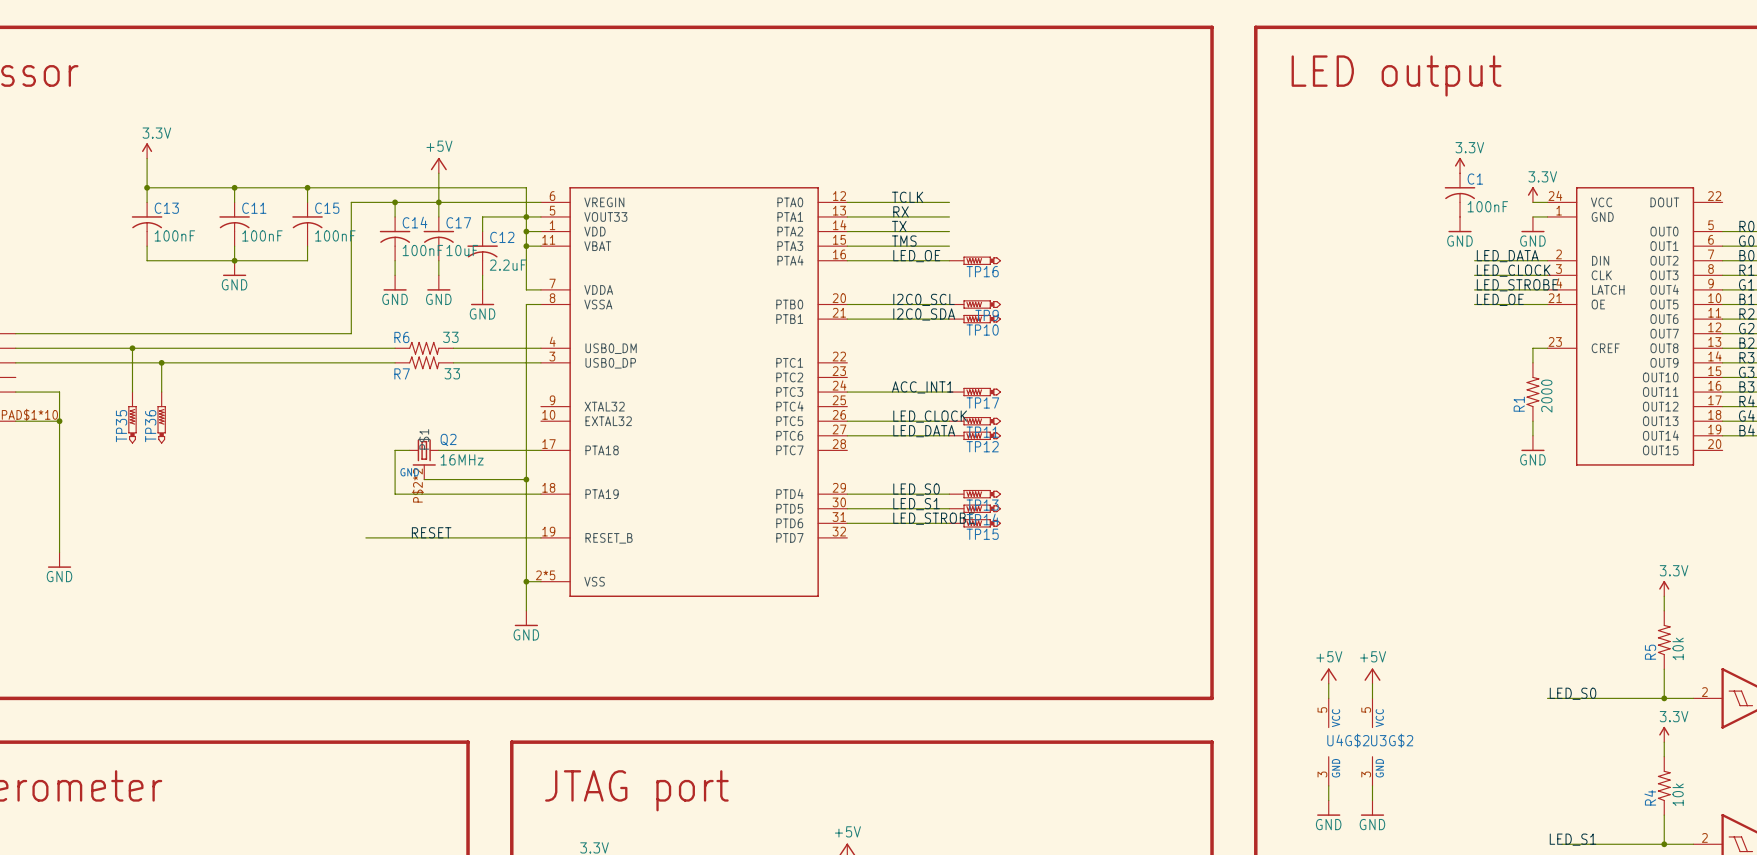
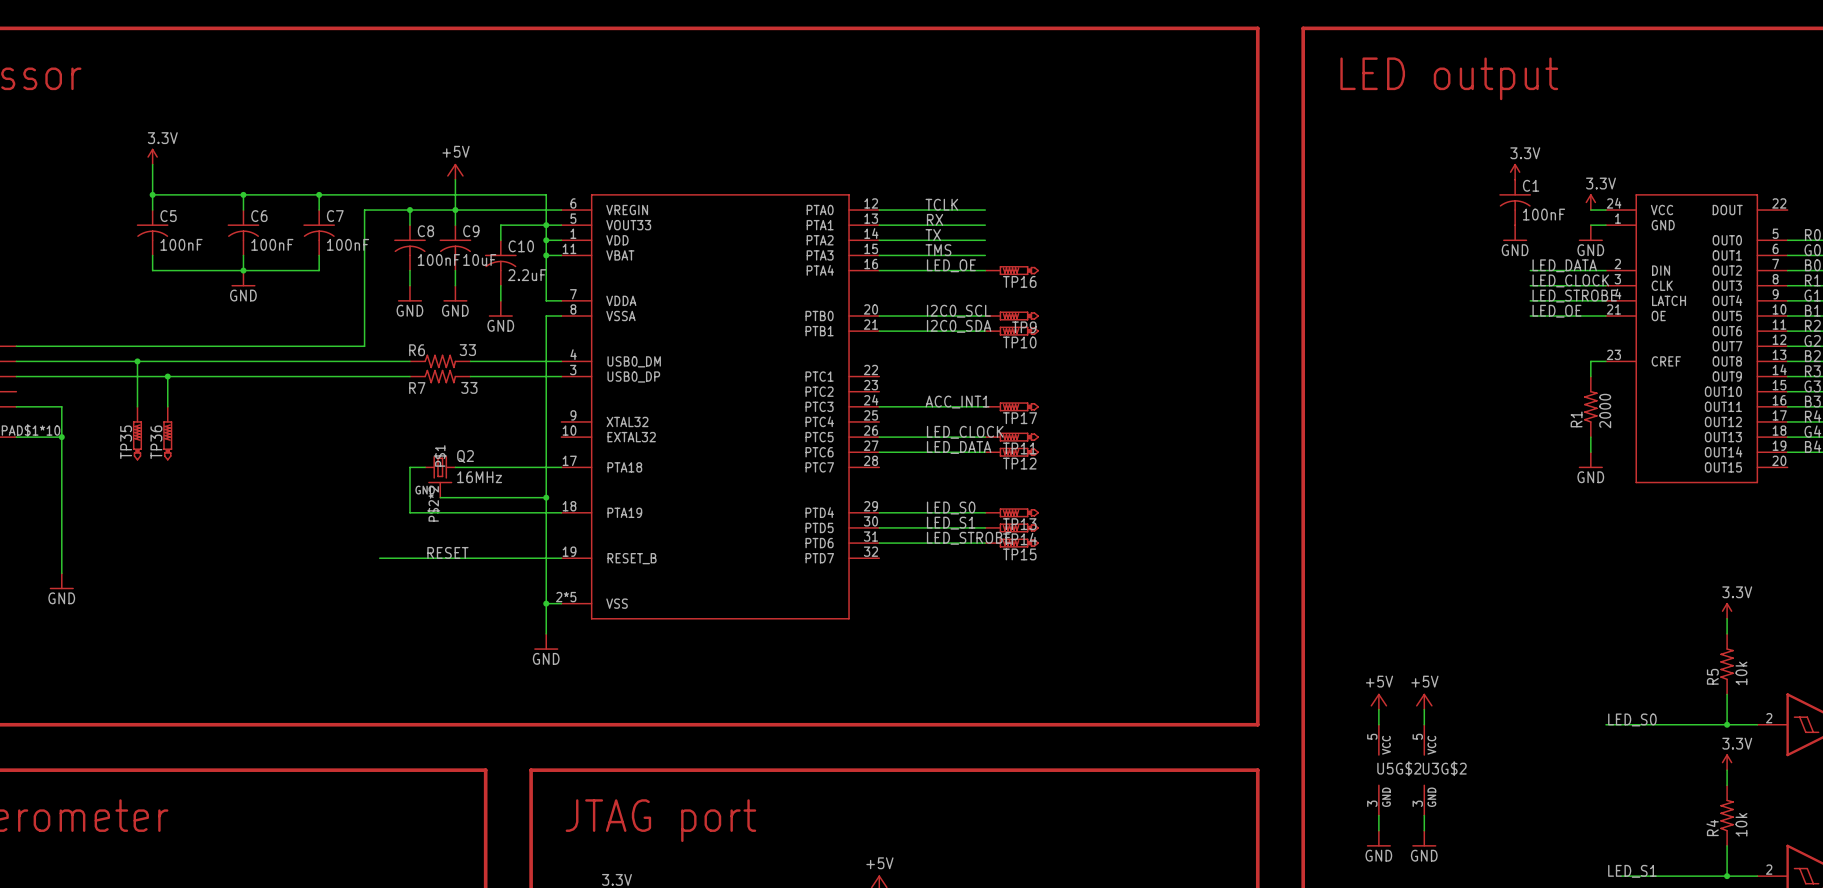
C13 name: C13 (166, 208) -> C5 (168, 216)
C11 name: C11 (254, 208) -> C6 (259, 216)
C15 name: C15 (327, 208) -> C7 (335, 216)
C14 name: C14 (415, 222) -> C8 (425, 231)
C17 name: C17 (458, 222) -> C9 (471, 231)
C12 name: C12 (502, 237) -> C10 (521, 246)
U4G$2 name: U4G$2 (1348, 740) -> U5G$2 (1399, 768)

